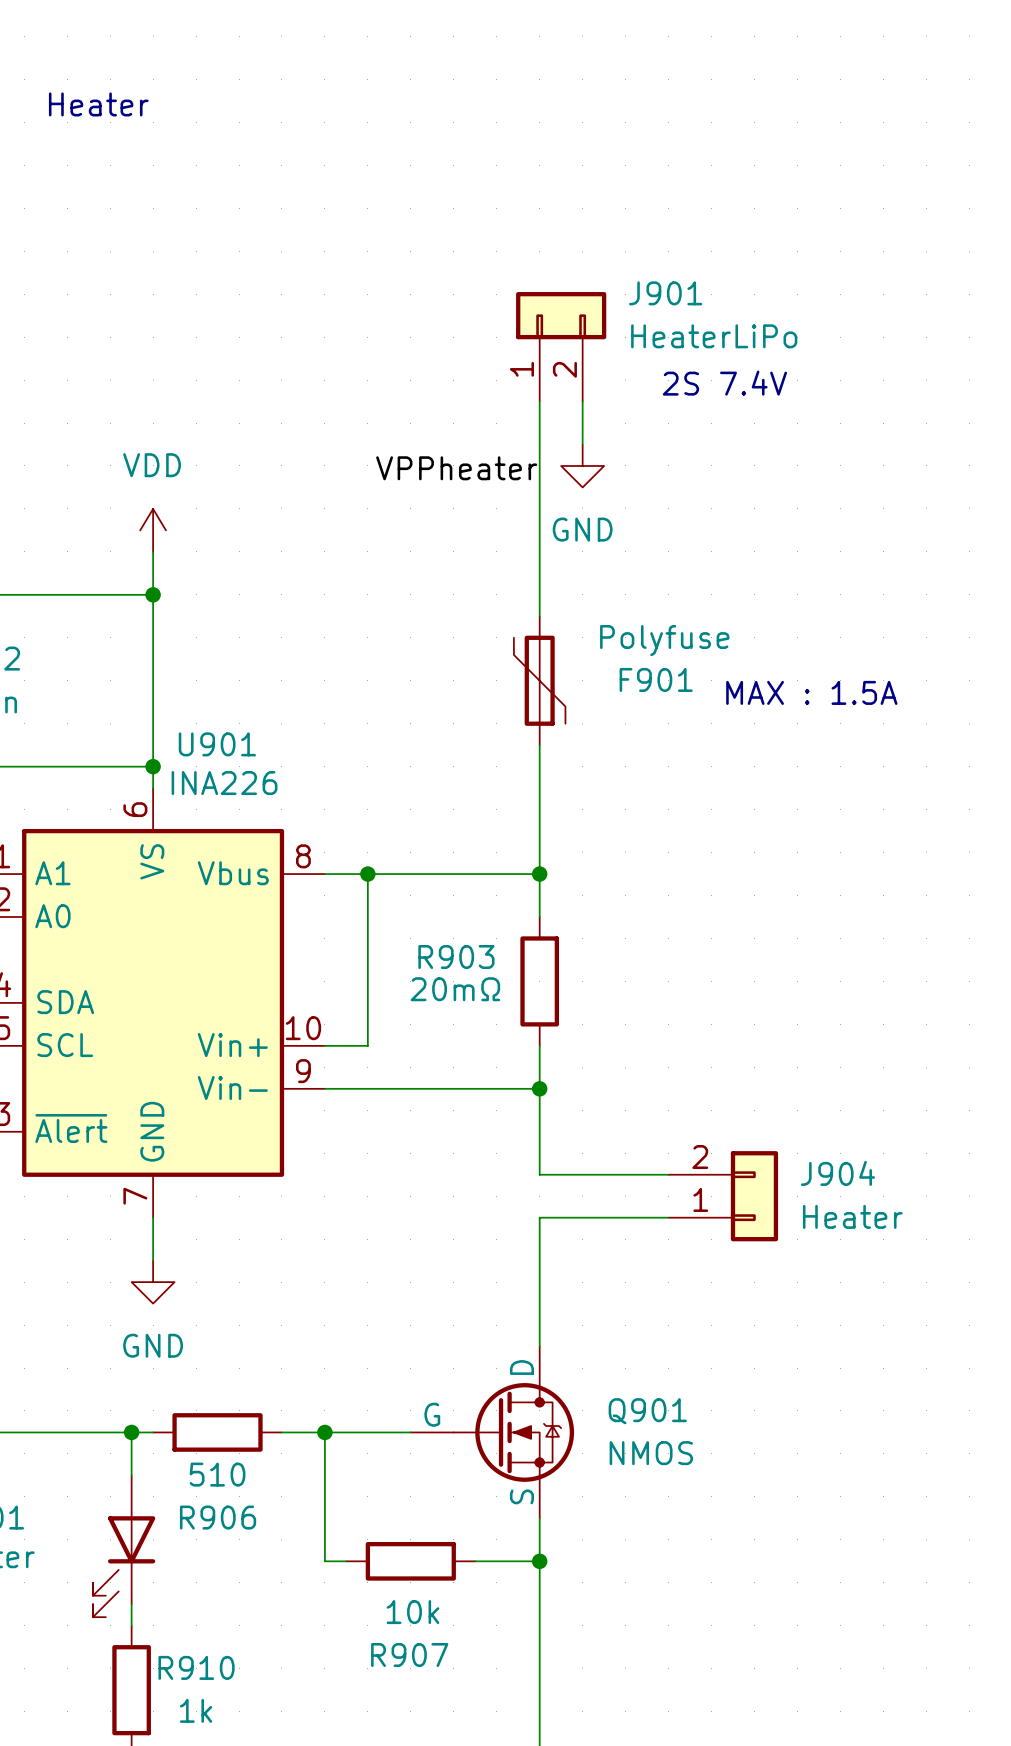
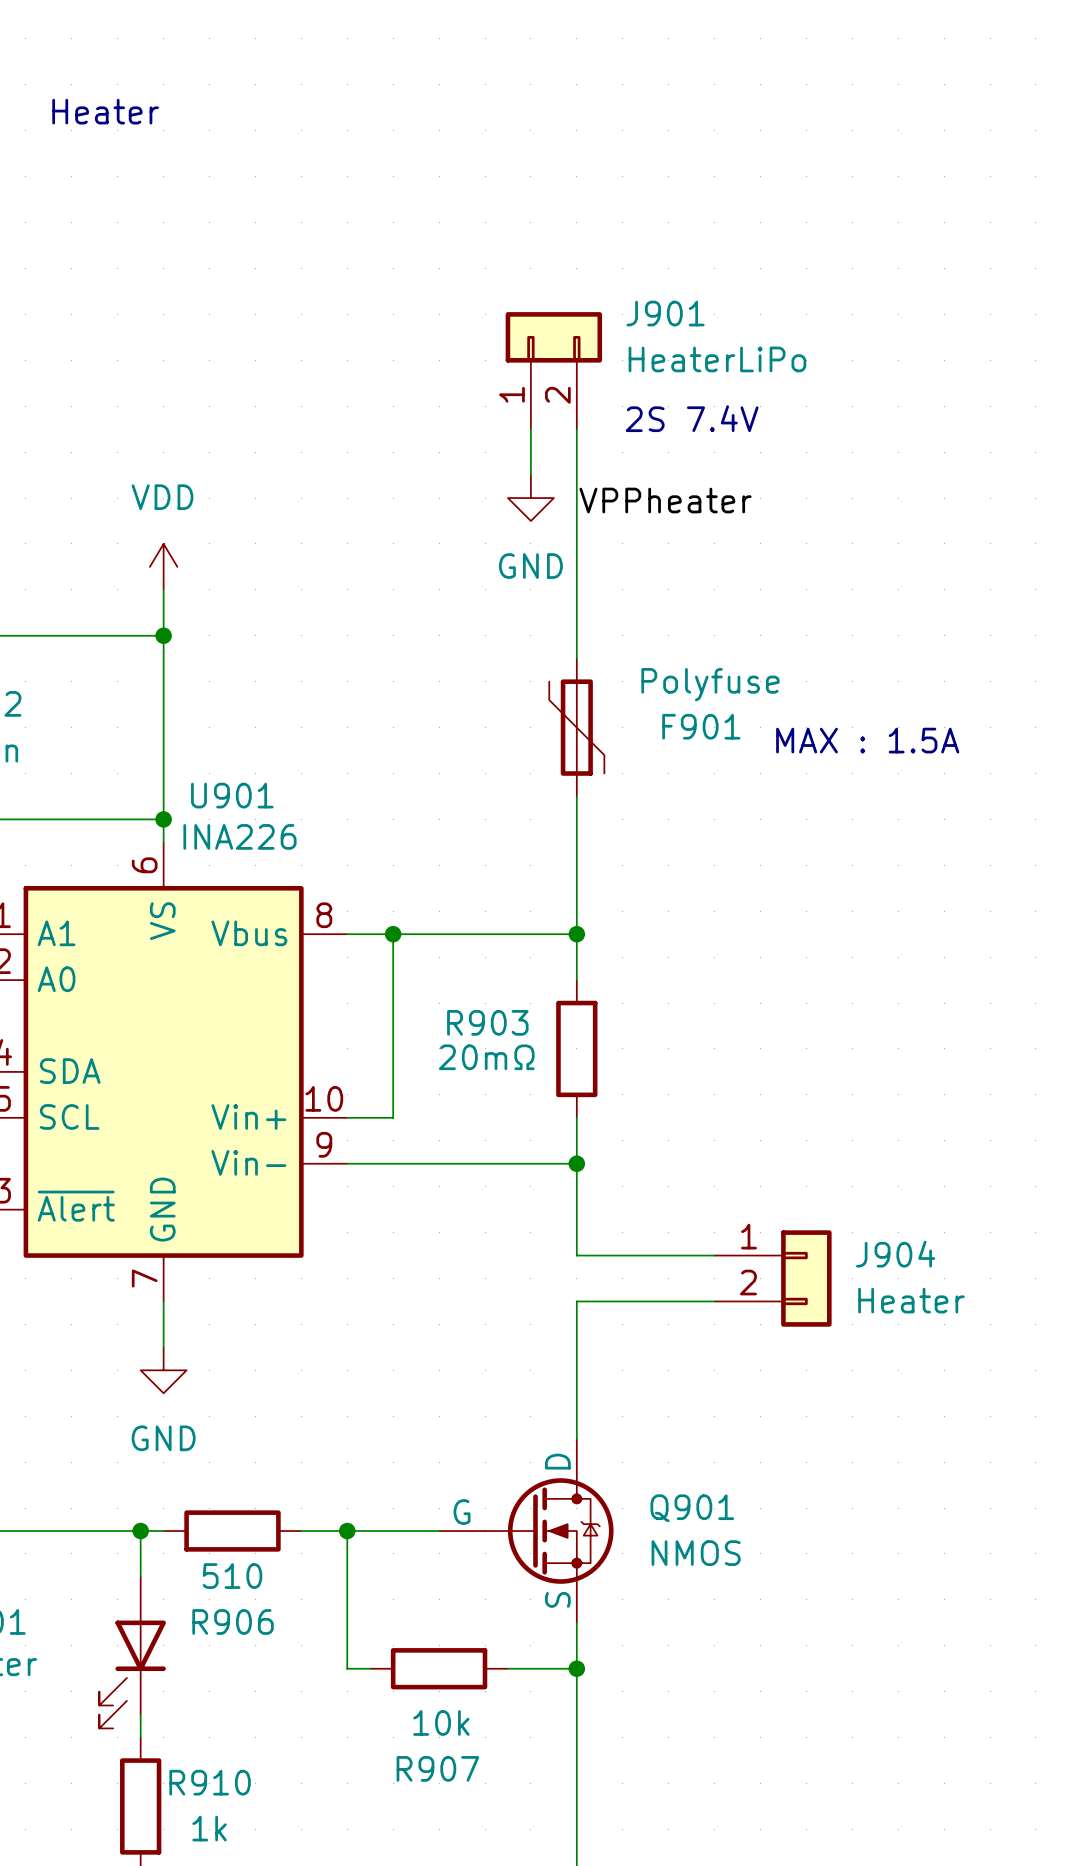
J901 position: (561, 346) -> (553, 370)
text position: 2S 7.4V (724, 383) -> 2S 7.4V (692, 418)
wire: (582, 401) (582, 444) -> (530, 429) (530, 475)
power symbol position: GND (582, 465) -> GND (530, 498)
label position: VPPheater (456, 468) -> VPPheater (665, 500)
J904 flip: as is (754, 1196) -> up-down (806, 1278)

